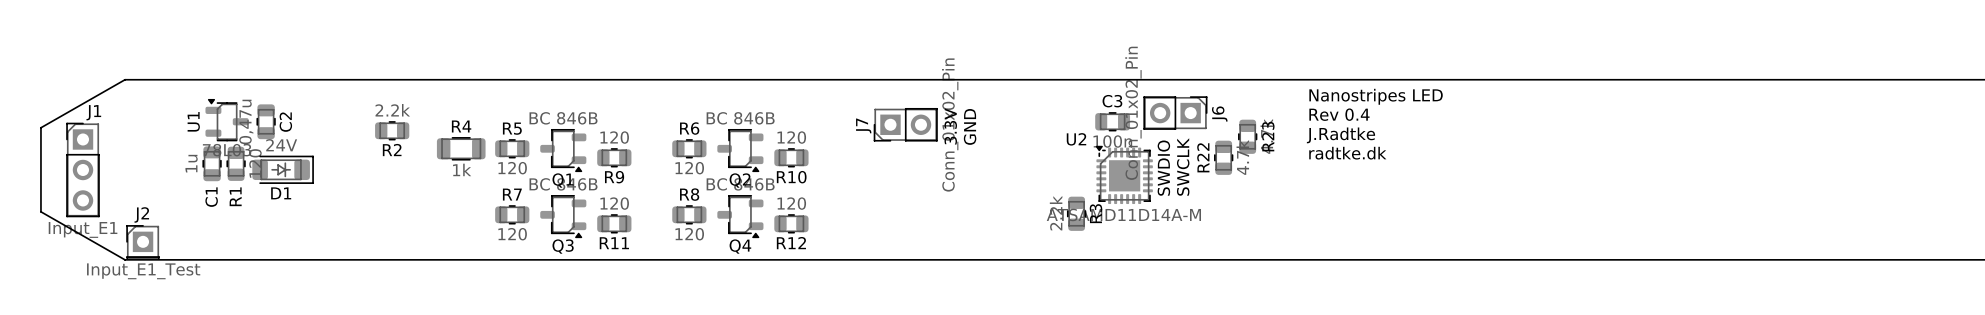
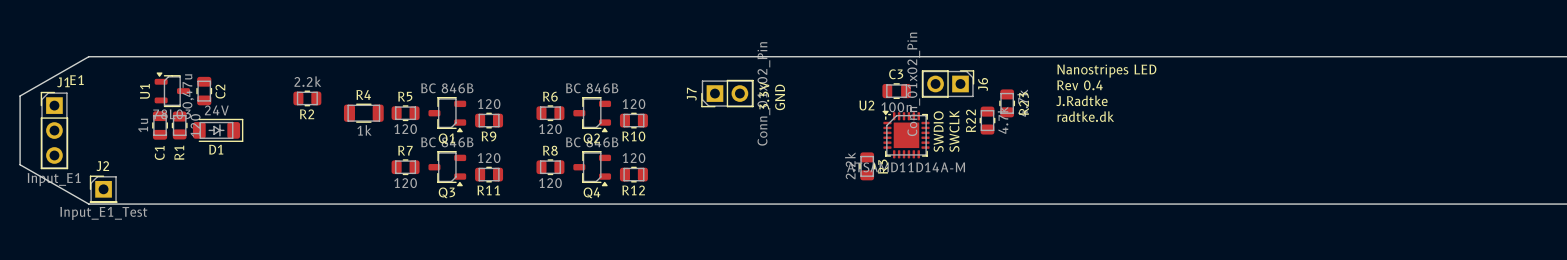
text: none -> E1 (76, 80)

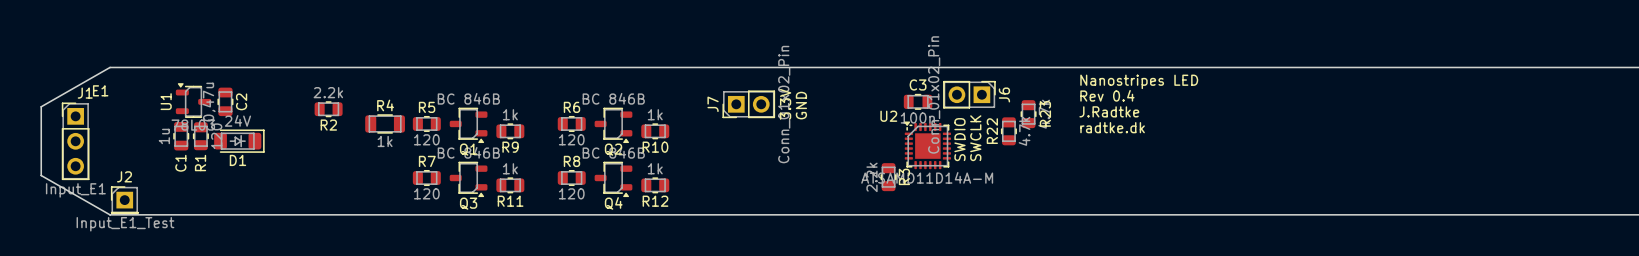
R9 value: 120 (489, 104) -> 1k (510, 114)
R10 value: 120 (633, 104) -> 1k (655, 114)
R11 value: 120 (489, 158) -> 1k (510, 168)
R12 value: 120 (633, 158) -> 1k (655, 168)

